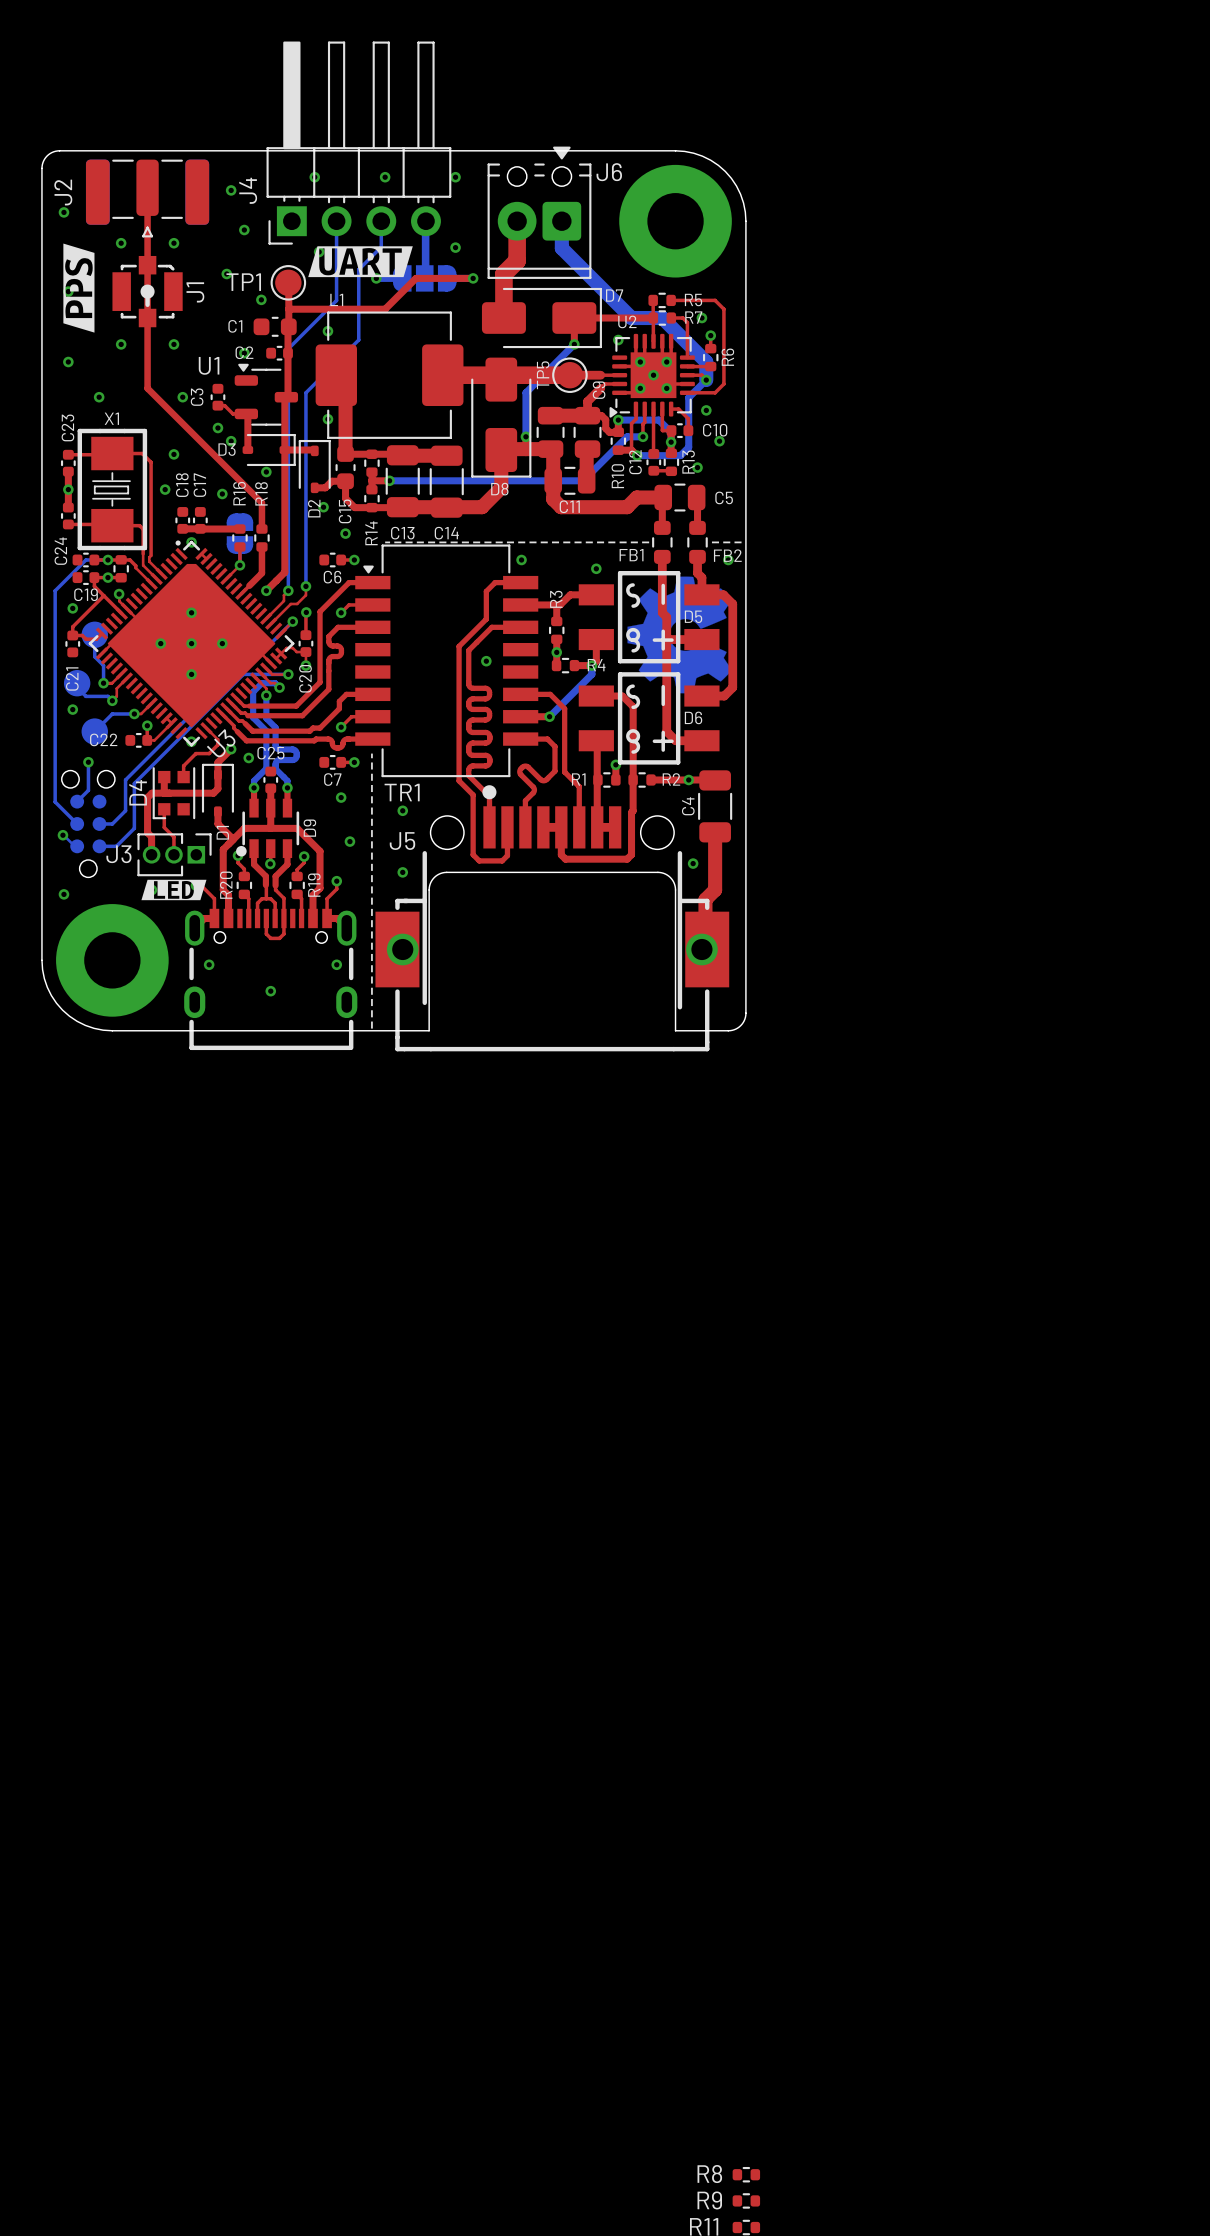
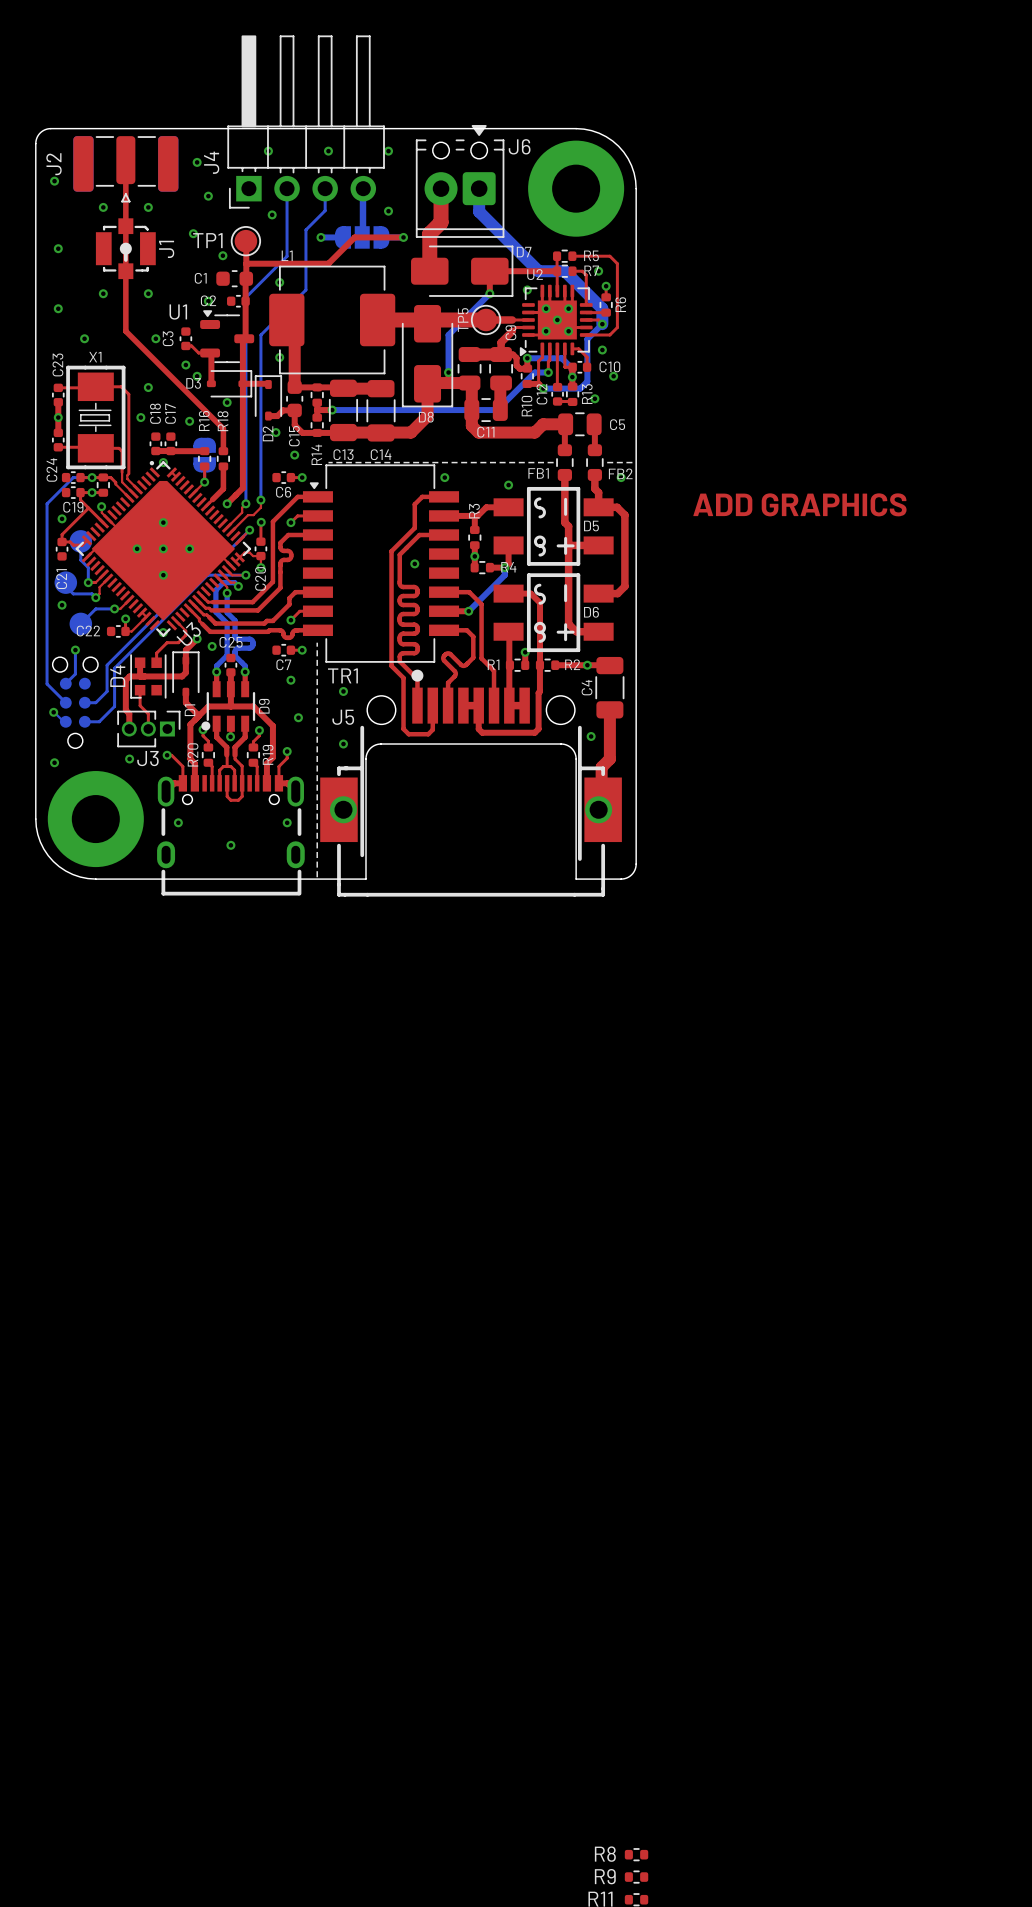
drawing: [63, 243, 95, 333] -> none
drawing: [308, 246, 413, 278] -> none
drawing: [627, 576, 732, 694] -> none
text: none -> ADD GRAPHICS (799, 504)
J3 name position: J3 (118, 854) -> J3 (147, 758)
drawing: [141, 879, 207, 901] -> none

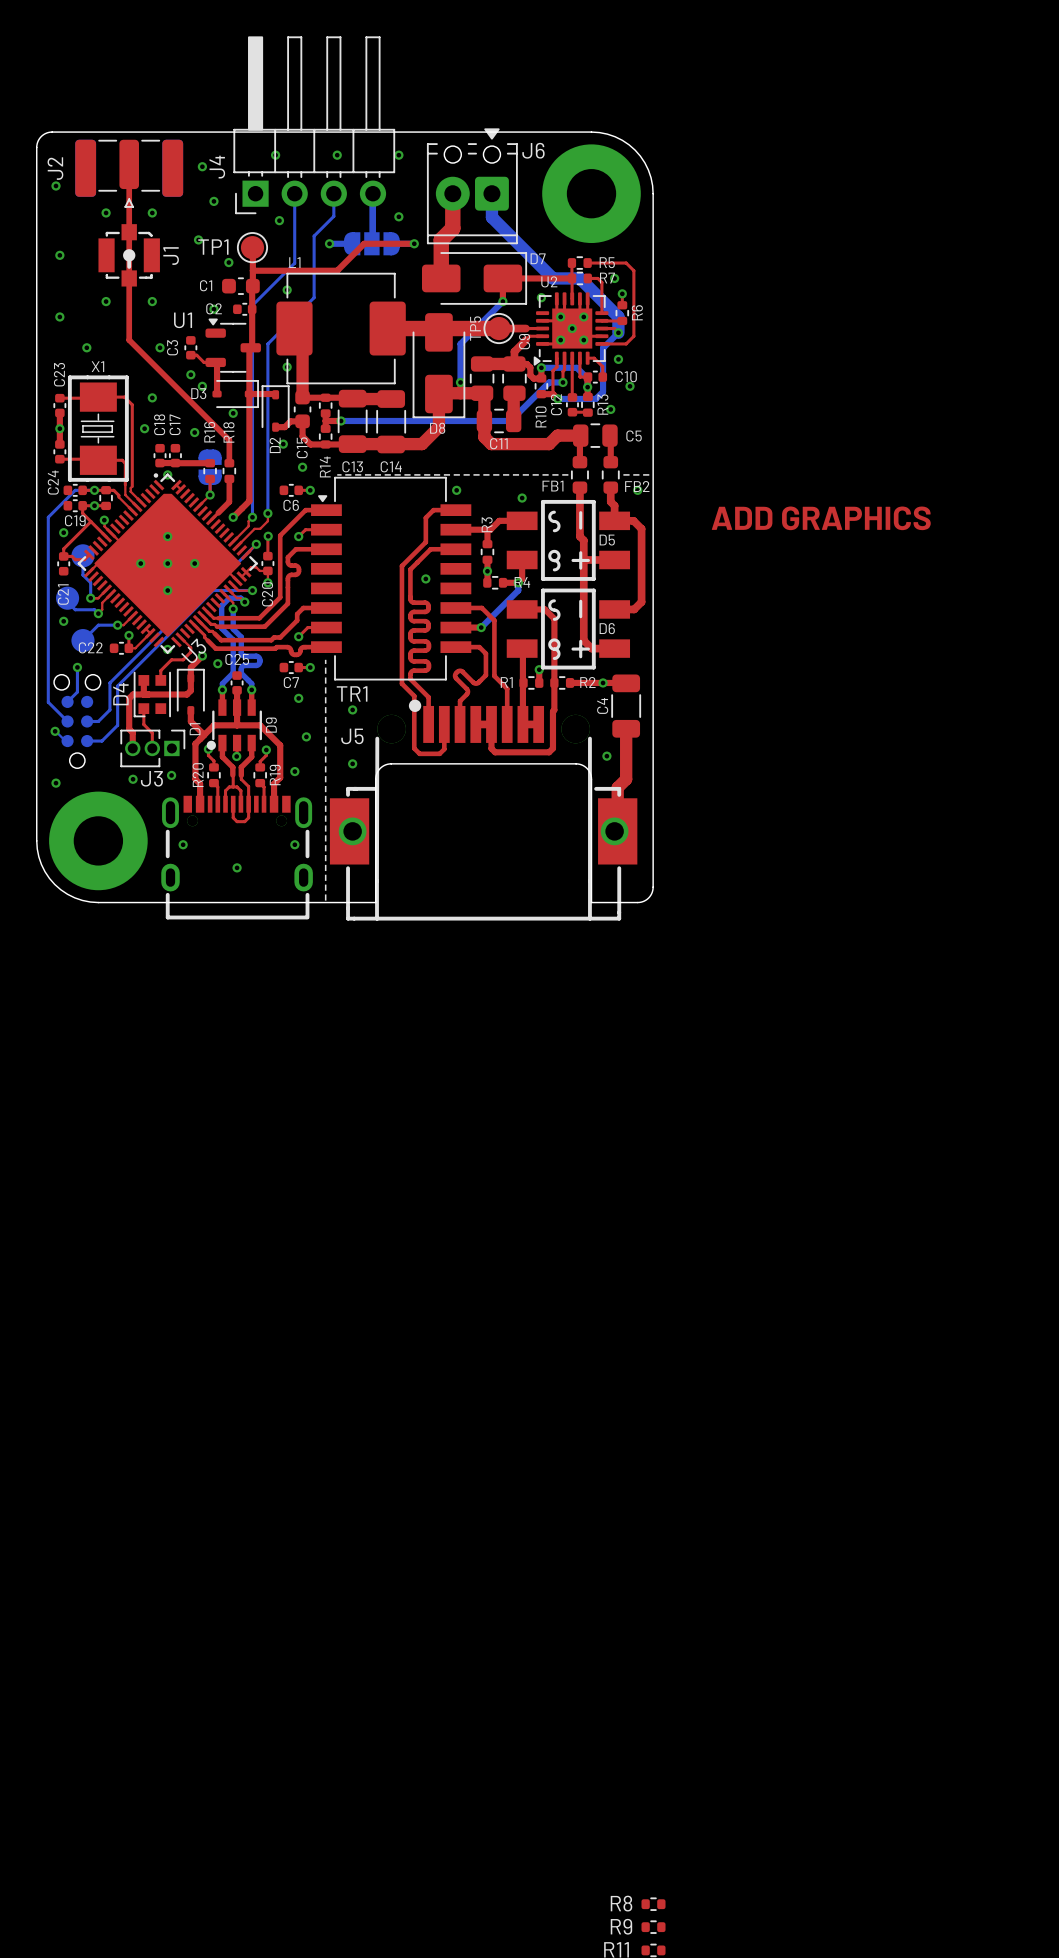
J5 footprint: [320, 669, 622, 897] -> [329, 699, 638, 921]
top track: (287, 751) (287, 758) (278, 766) (278, 783) (287, 783) (295, 791) -> none
top track: (167, 755) (171, 755) (182, 766) (182, 783) (174, 783) (166, 791) -> none
part footprint: [157, 775, 305, 896] -> [161, 795, 313, 920]

